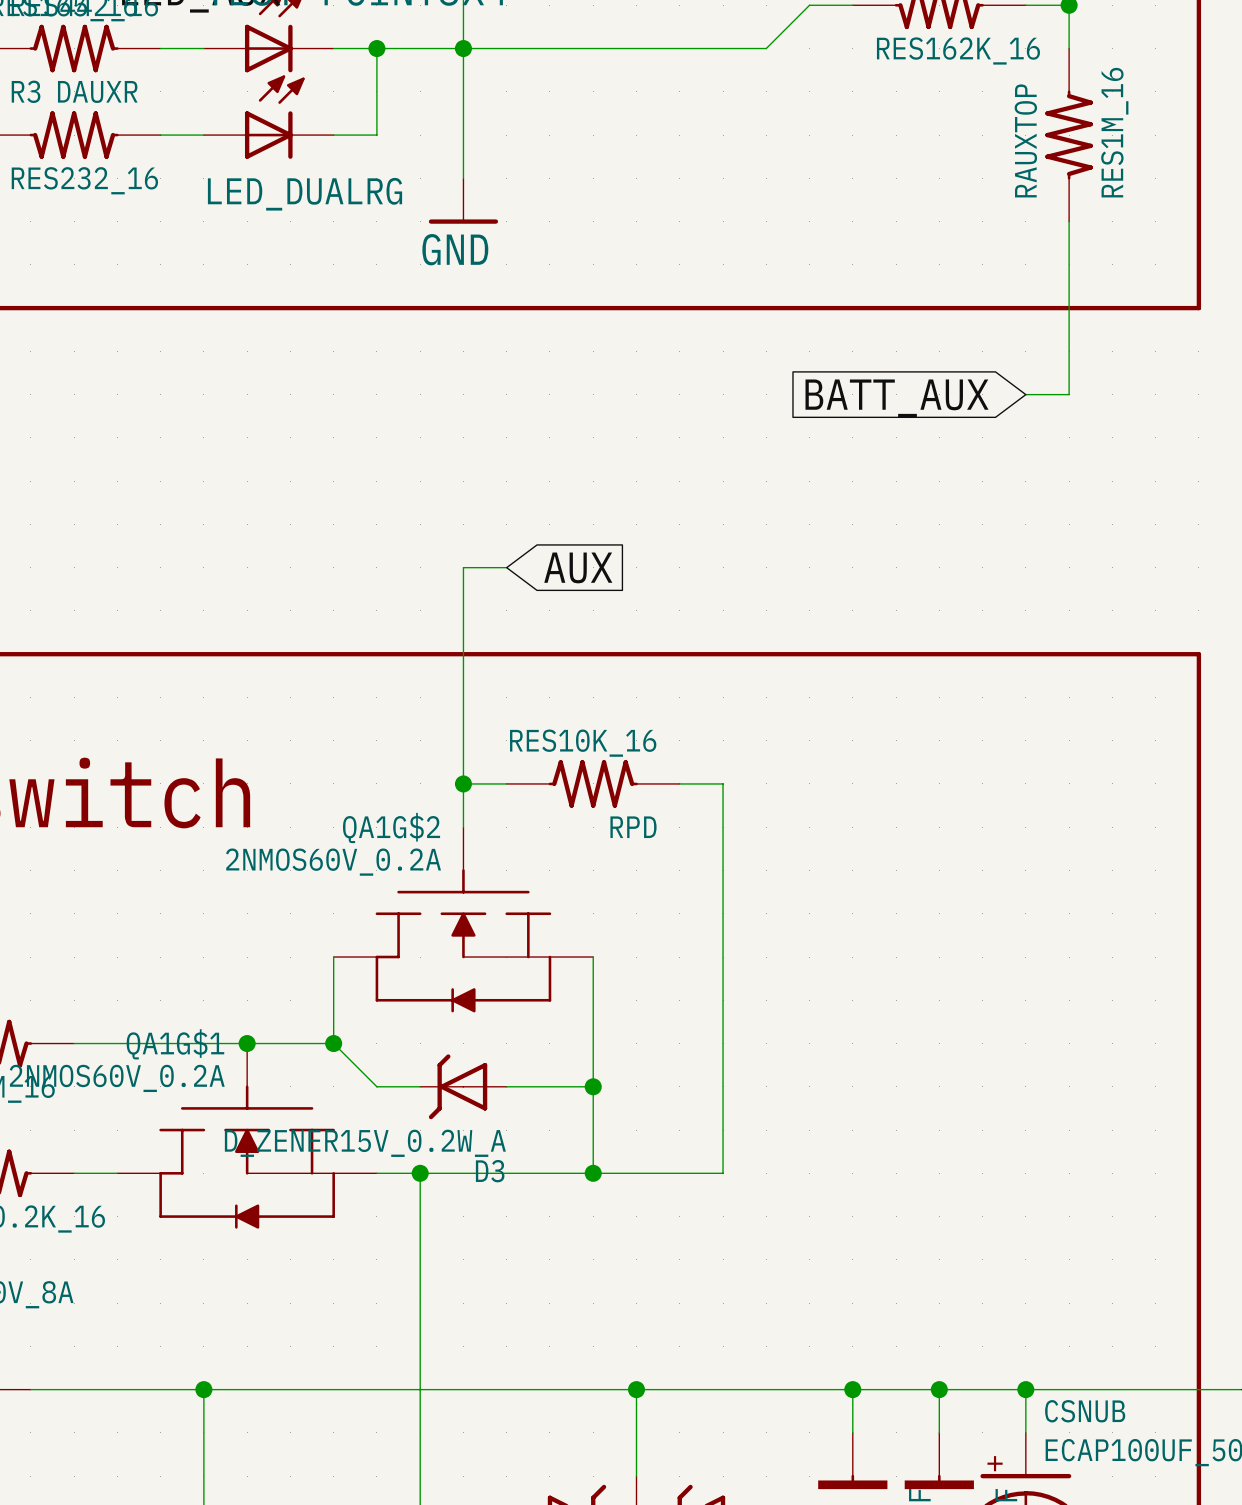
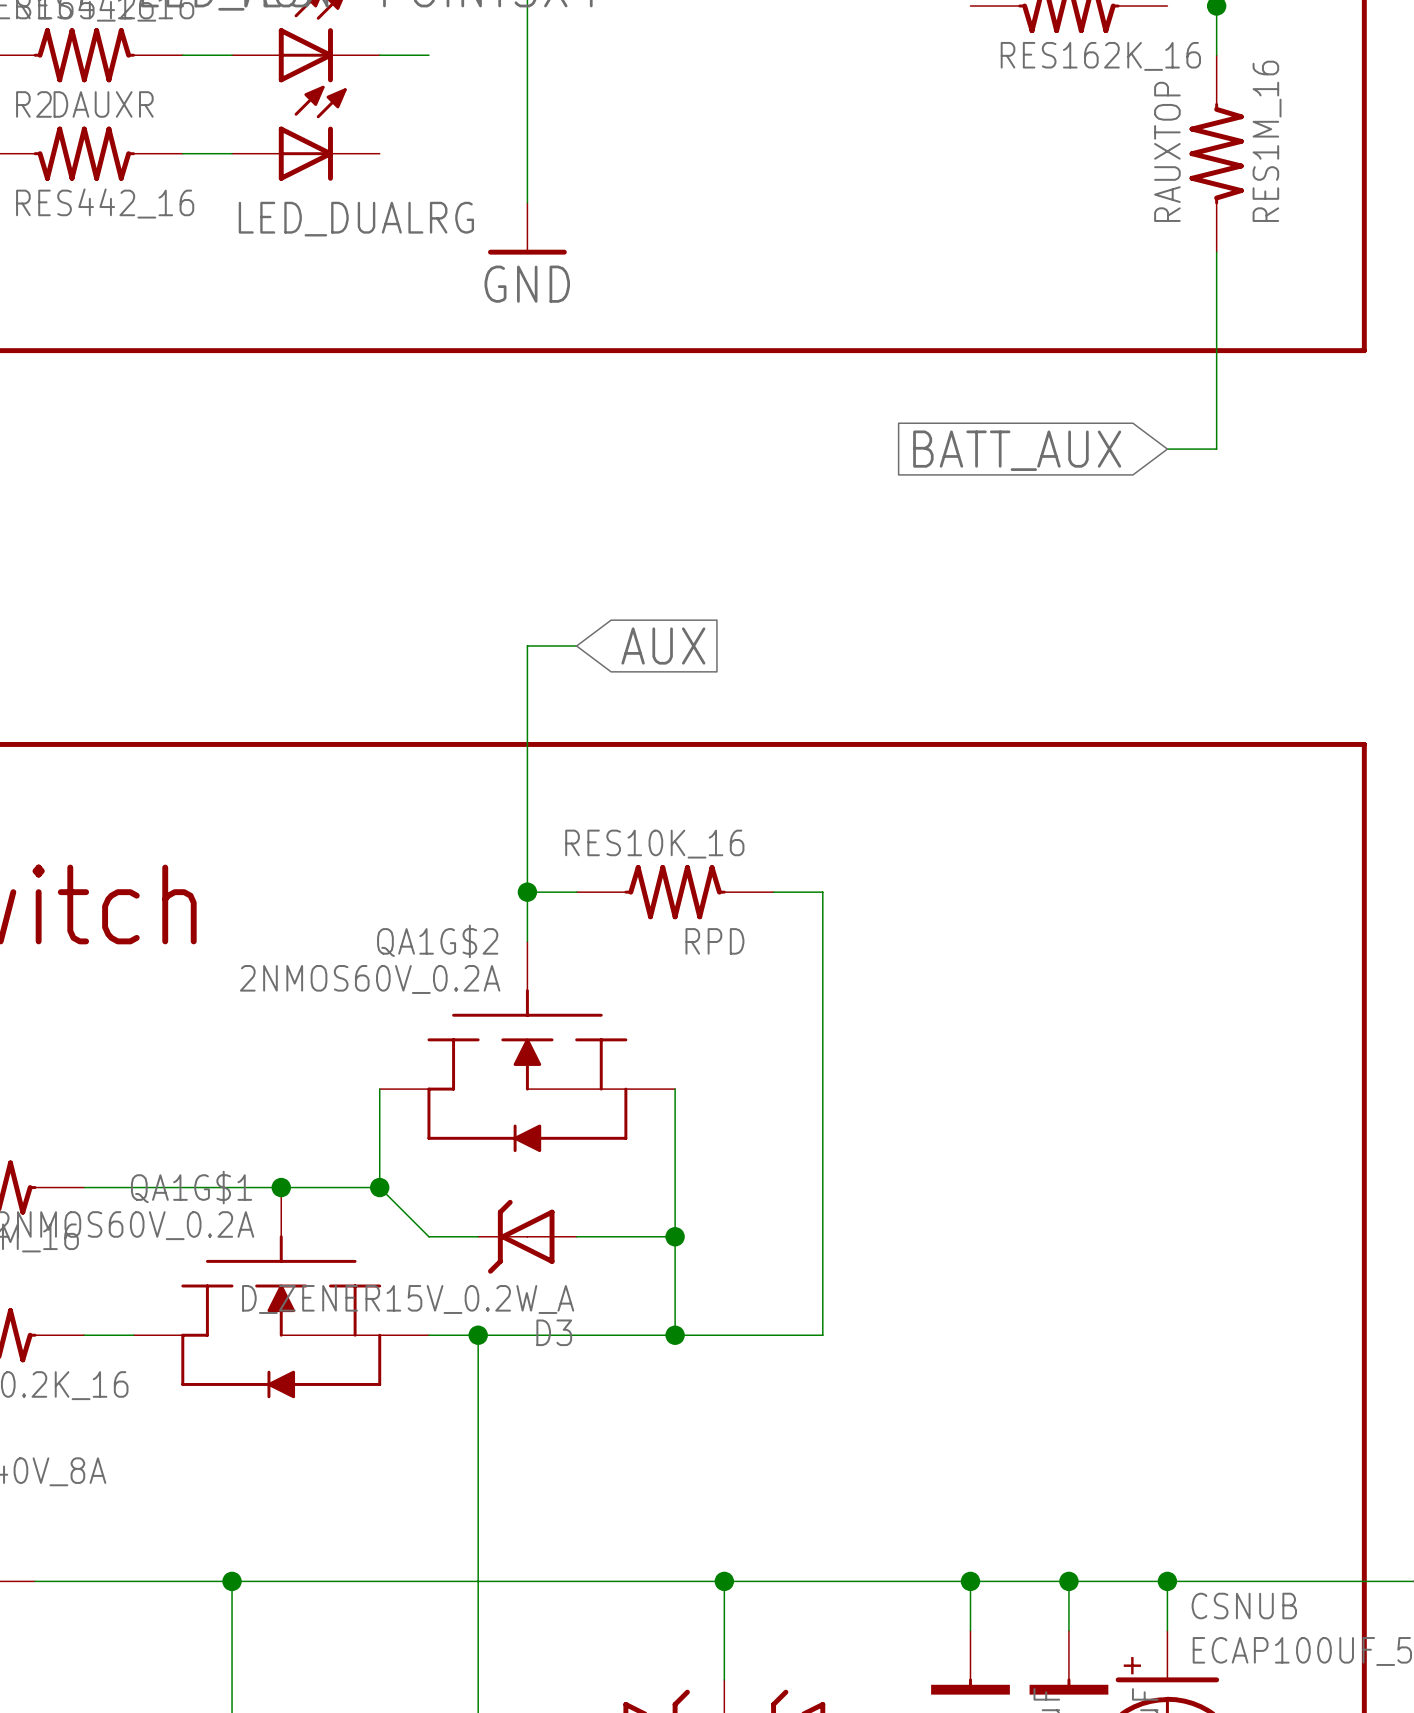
wire: (852, 5) (809, 5) (766, 48) (376, 48) (376, 135) (333, 135) -> none
wire: (1025, 5) (1069, 5) -> none
junction: (376, 48) -> none
junction: (463, 48) -> none
R3 name: R3 (26, 91) -> R2 (33, 104)
R3 value: RES232_16 (84, 180) -> RES442_16 (105, 203)

